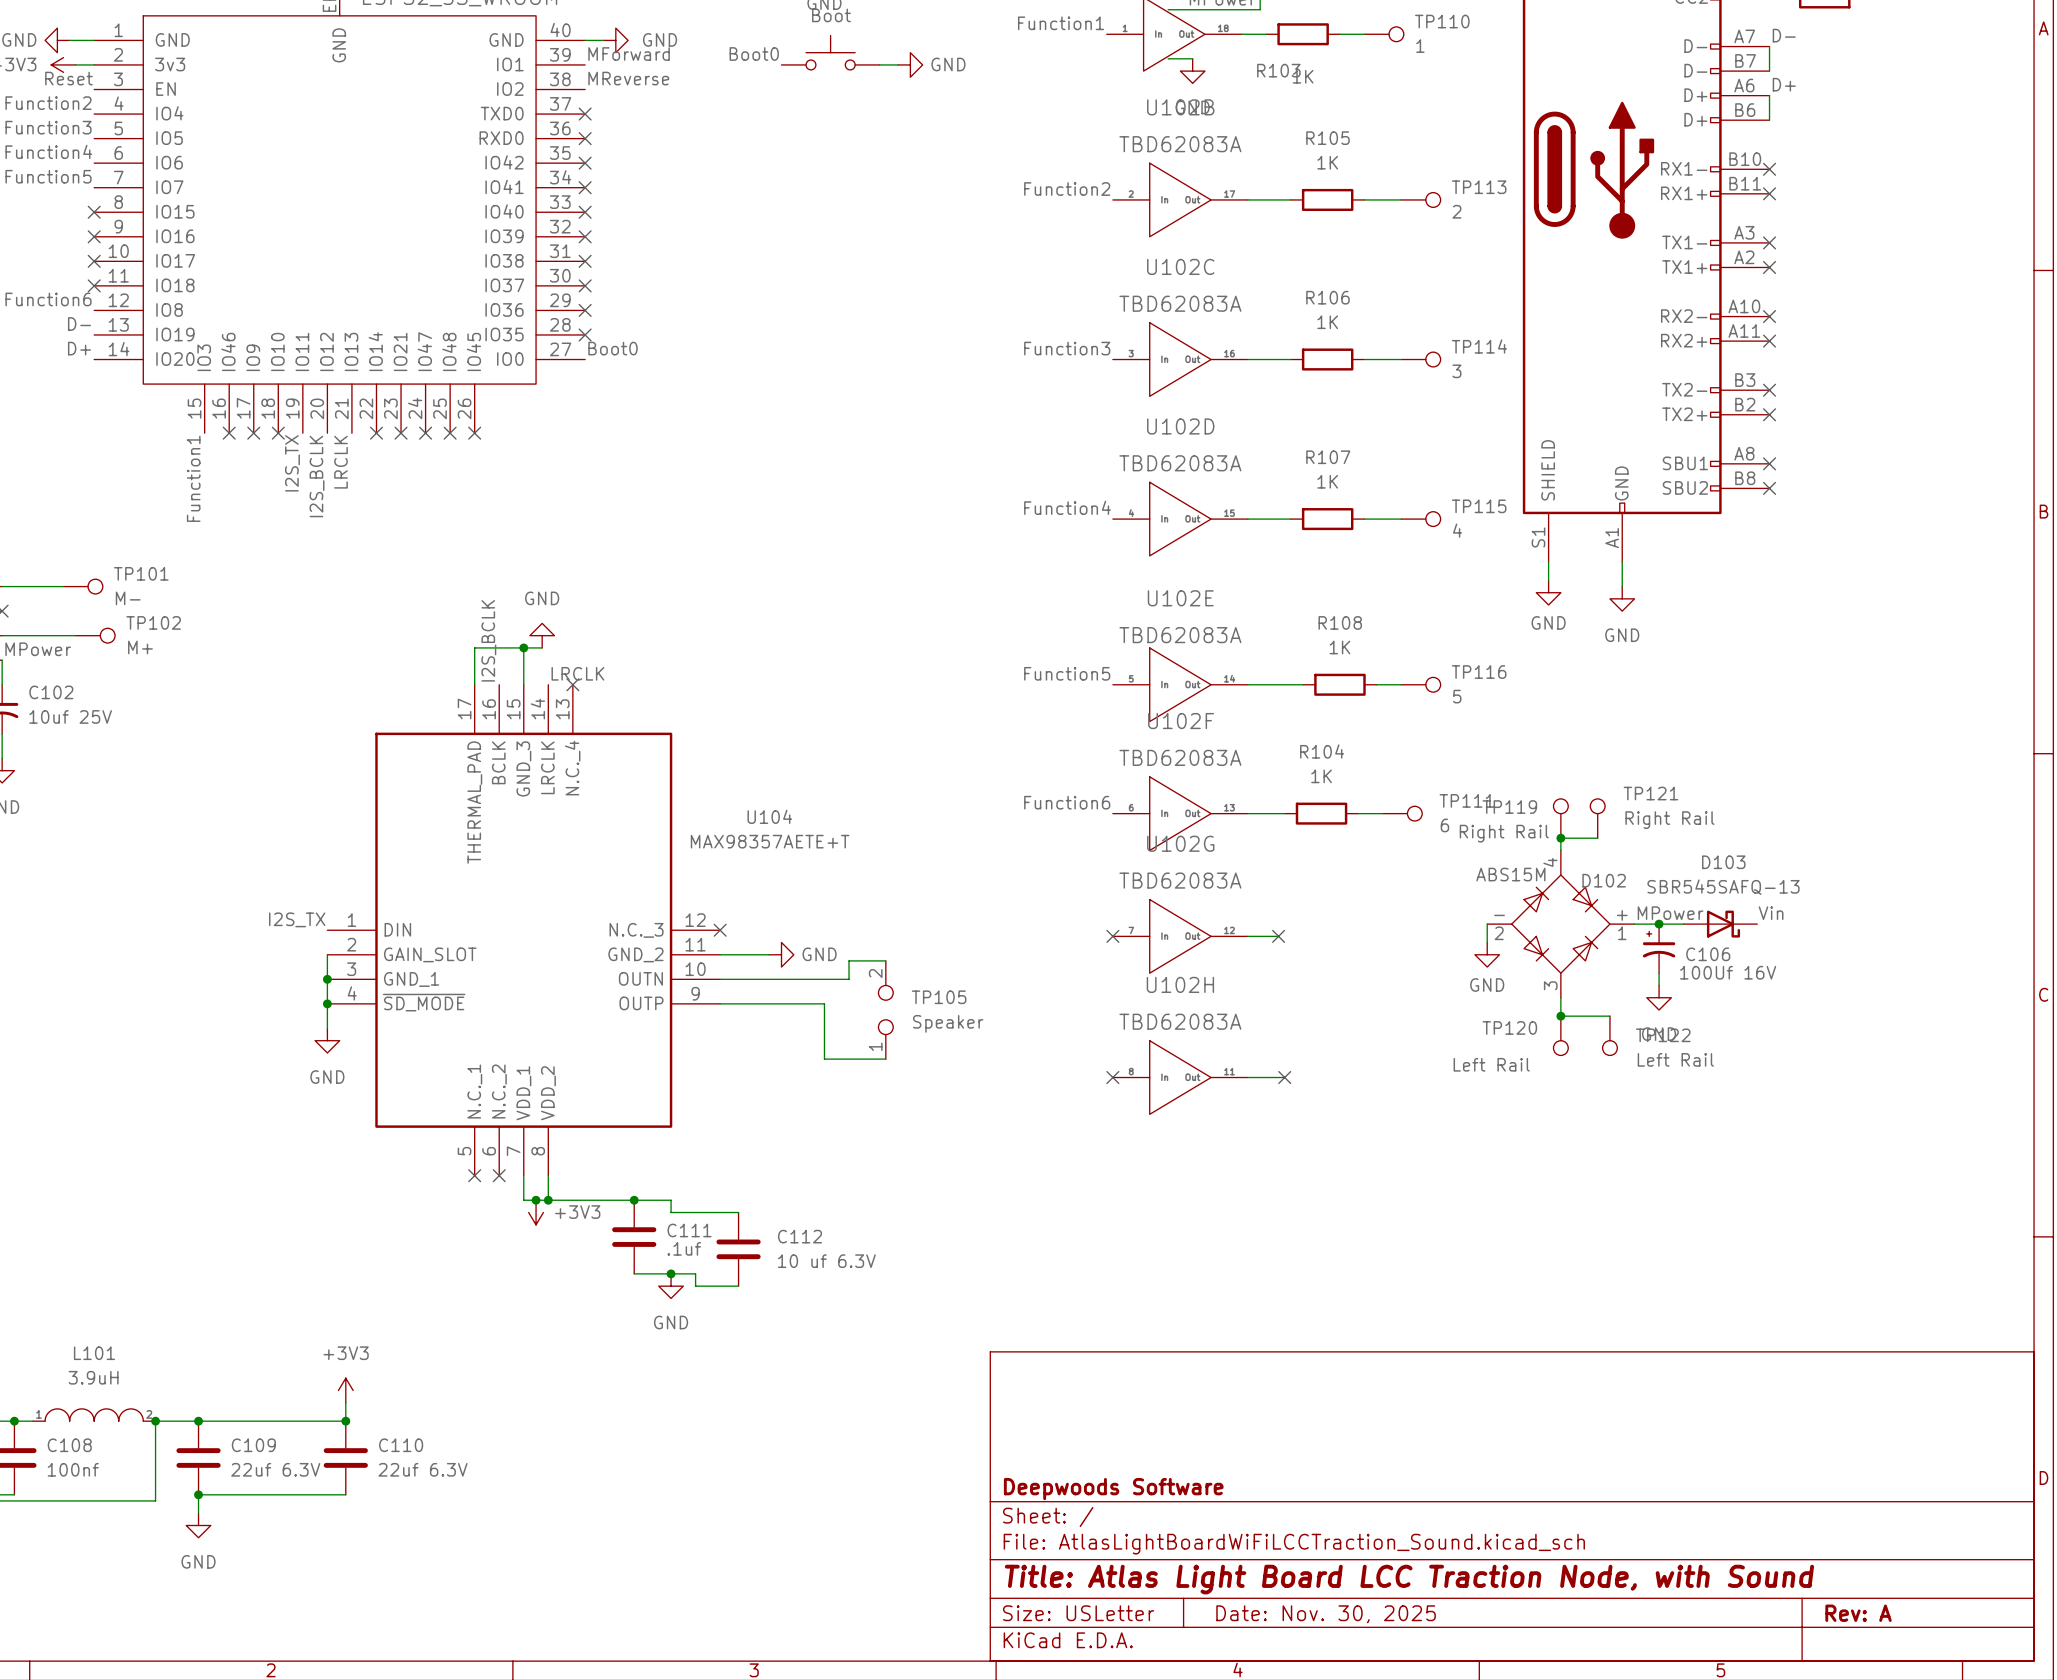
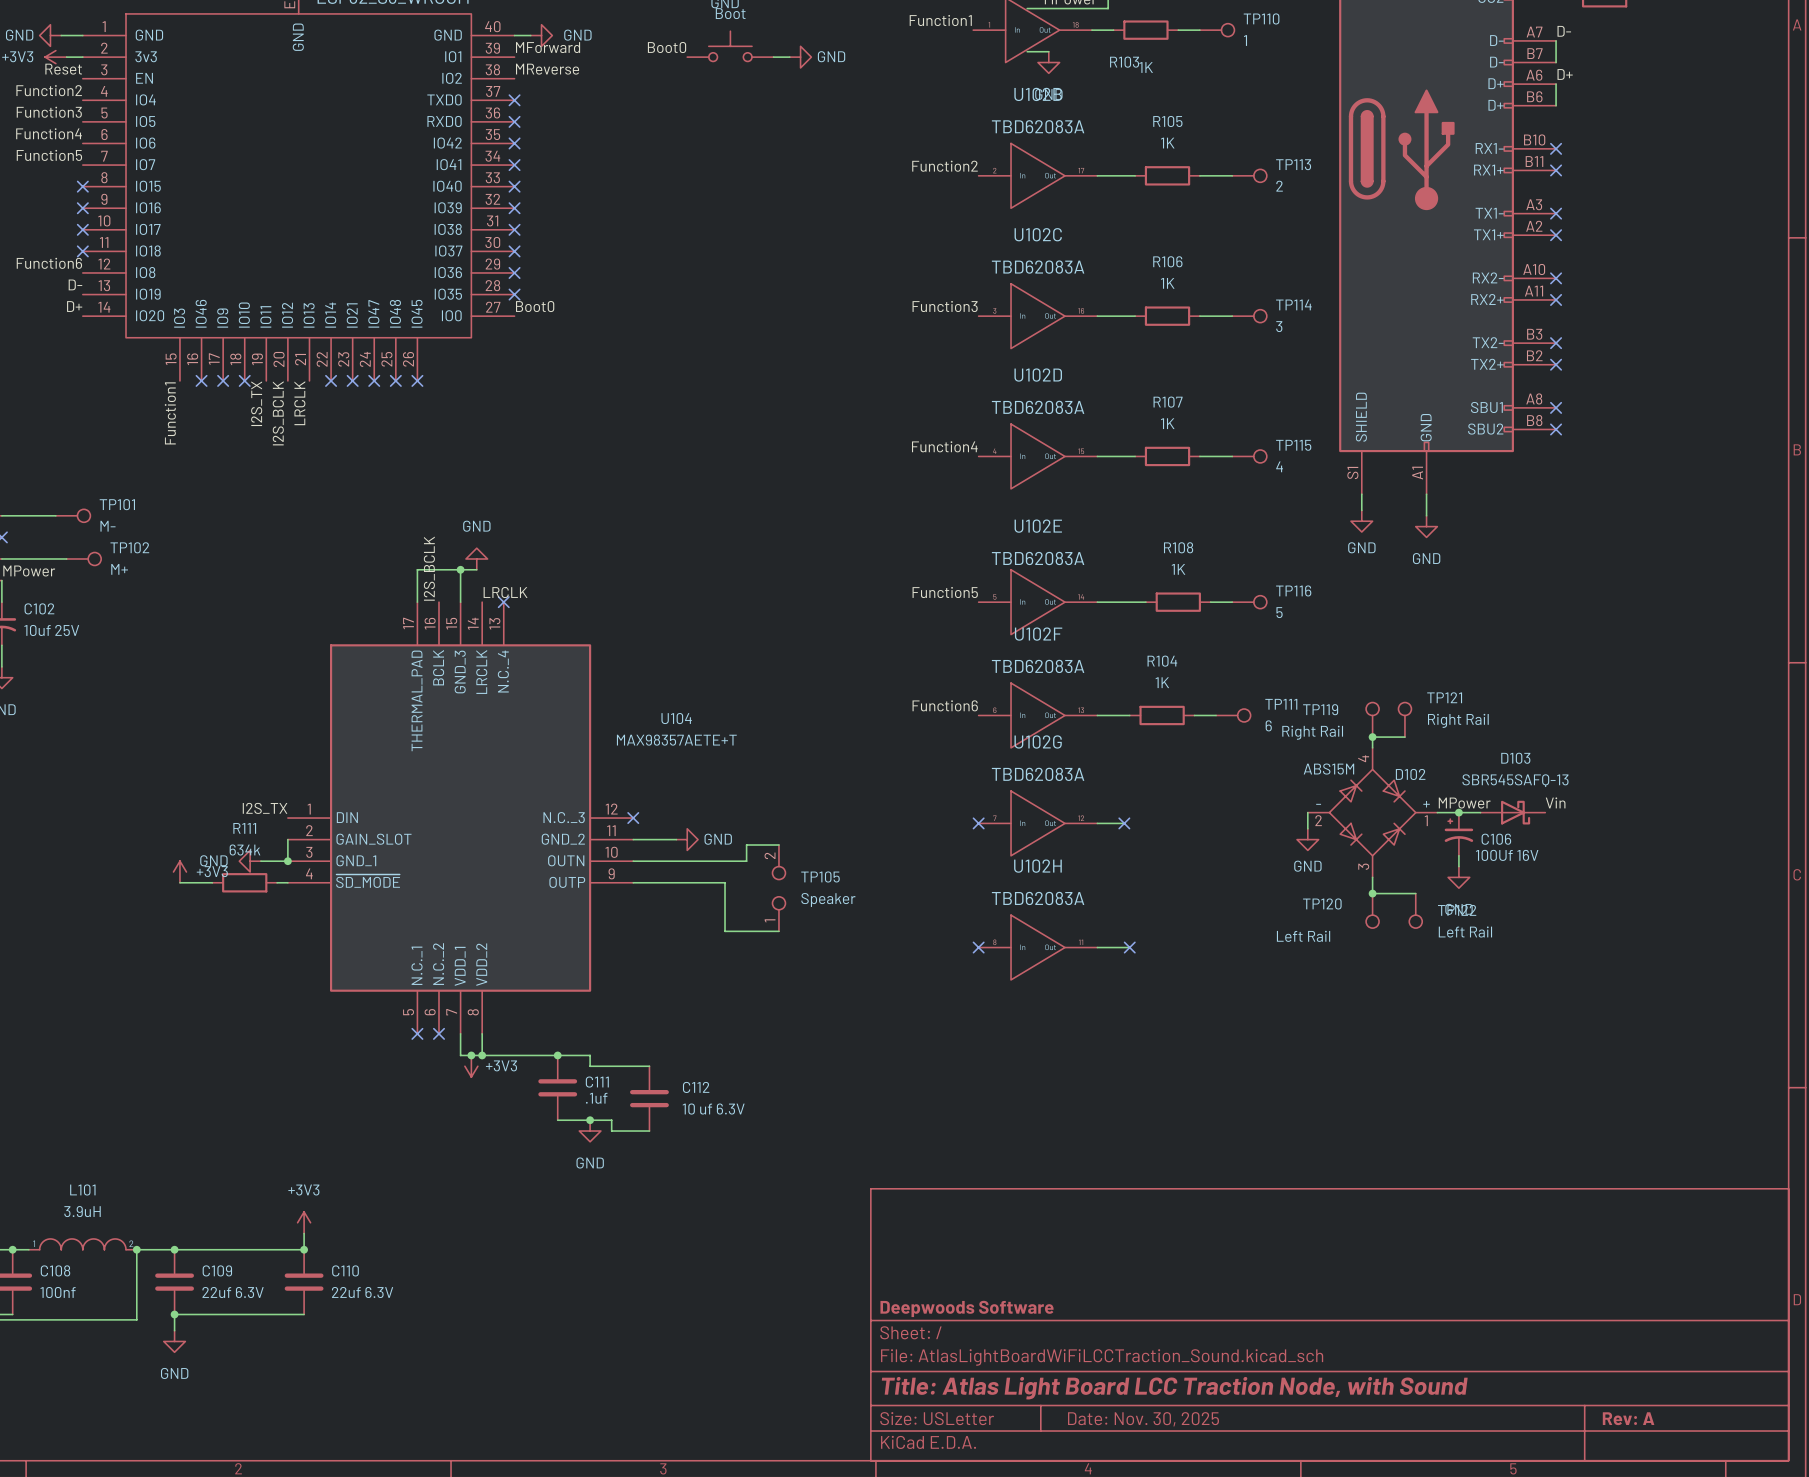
wire: (327, 979) (327, 1028) -> (287, 861) (260, 861)
power symbol: none -> +3V3 (179, 871)
wire: none -> (179, 882) (212, 882)
R111: none -> 634k (244, 882)
wire: none -> (277, 882) (287, 882)
junction: (327, 1003) -> none
power symbol rotation: 0° (327, 1040) -> 90° clockwise (250, 861)
power symbol position: GND (327, 1040) -> GND (250, 861)

